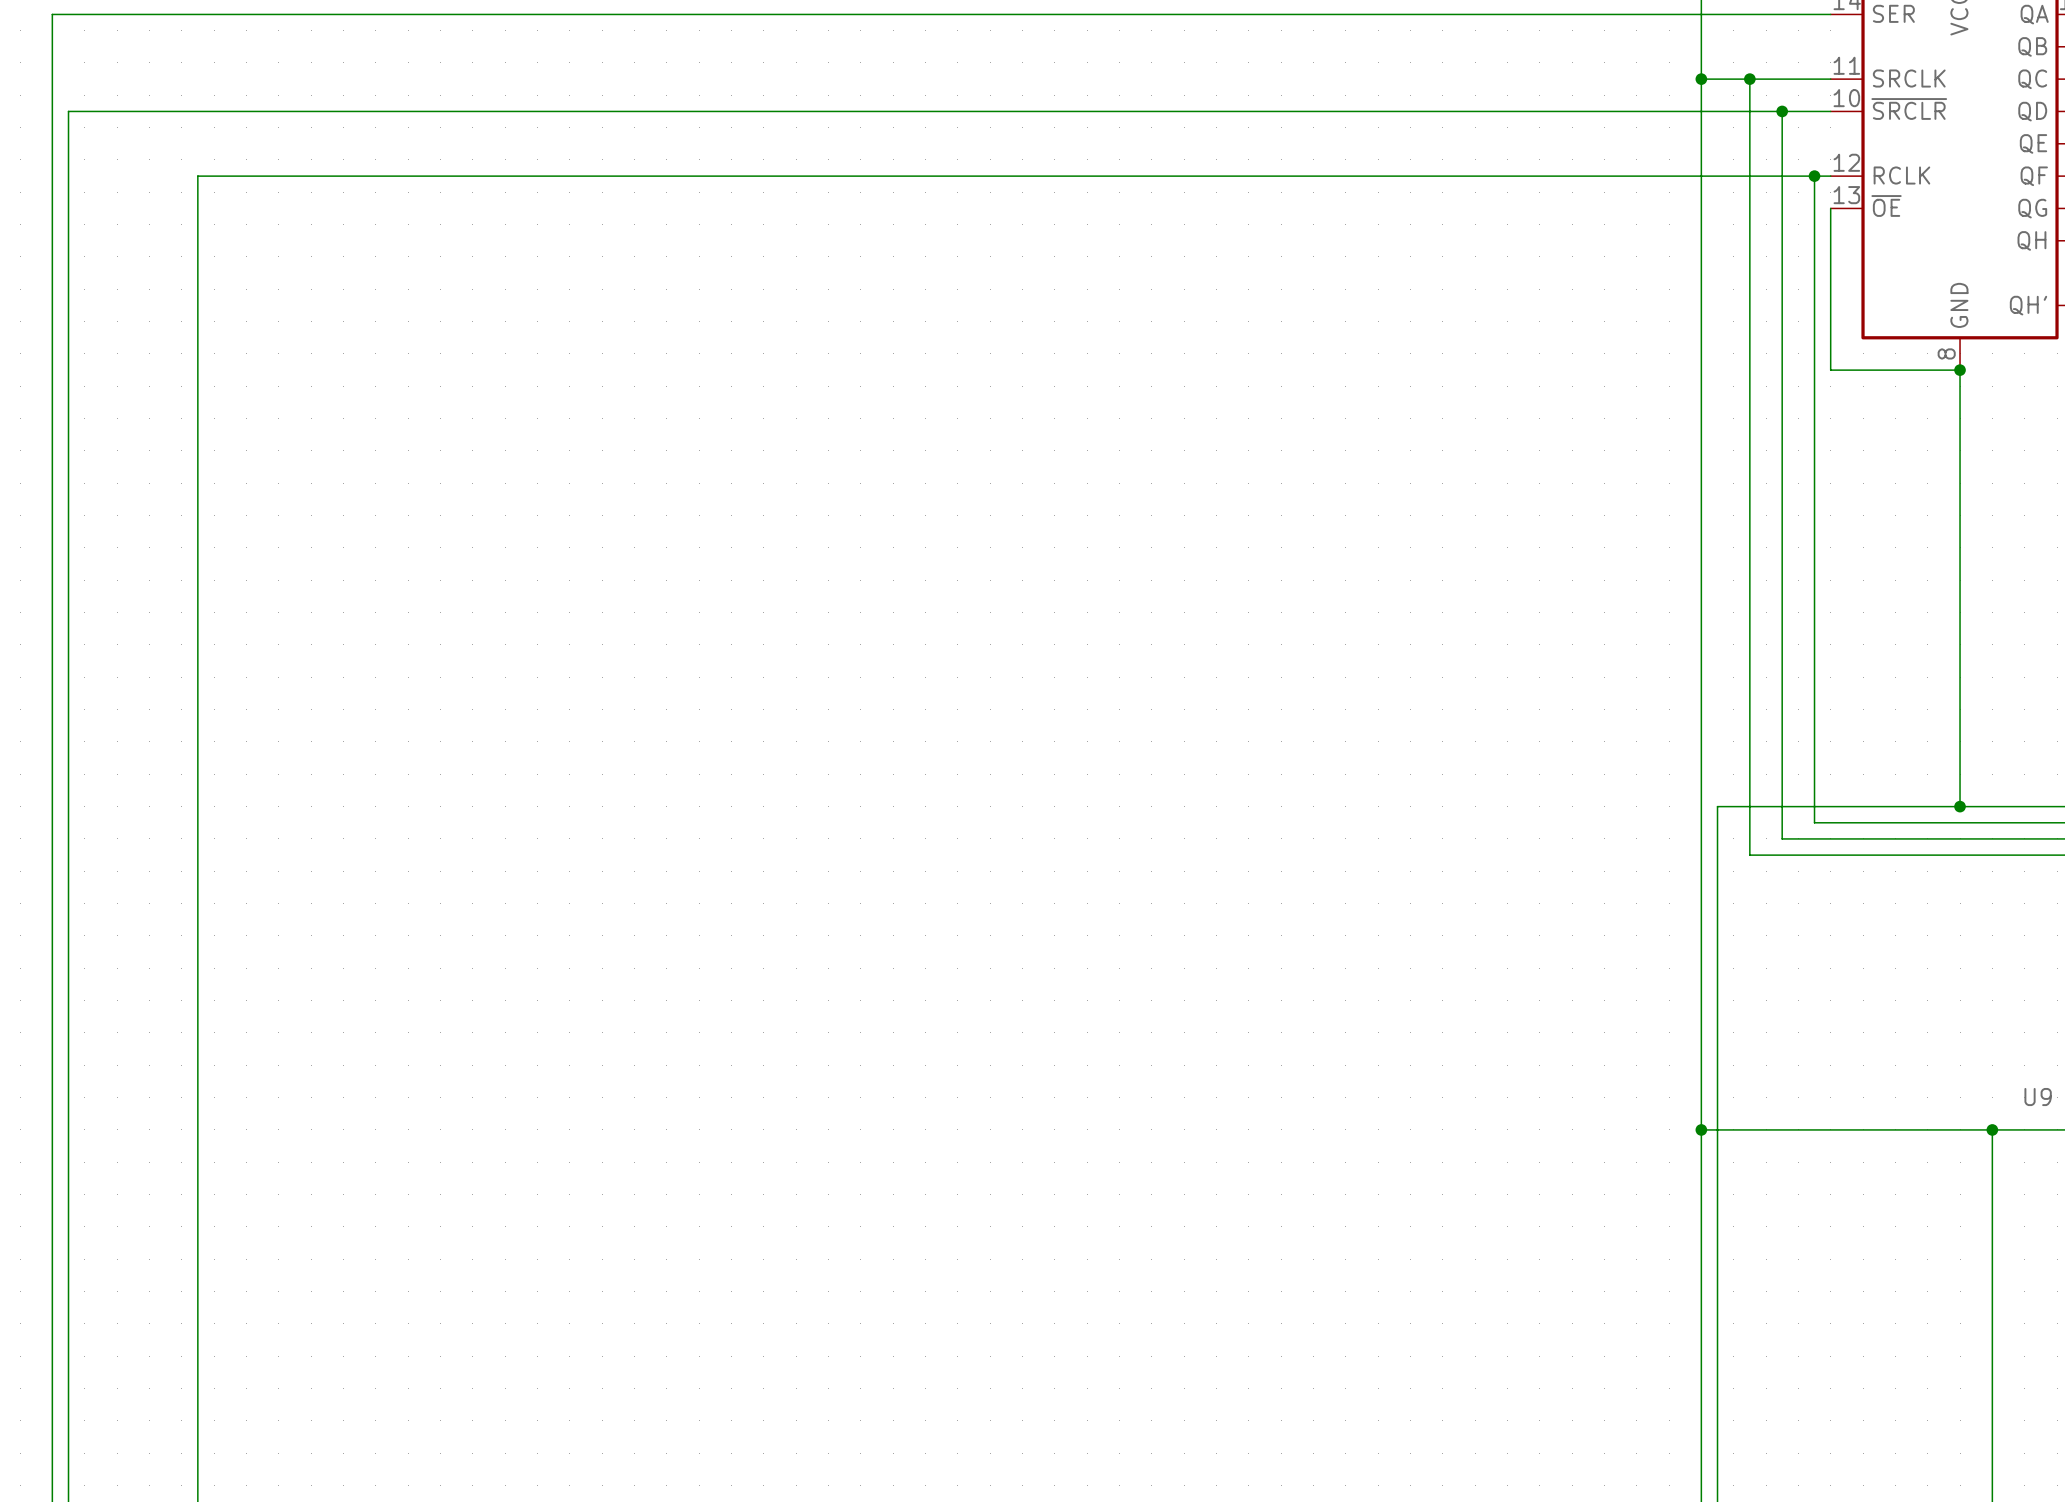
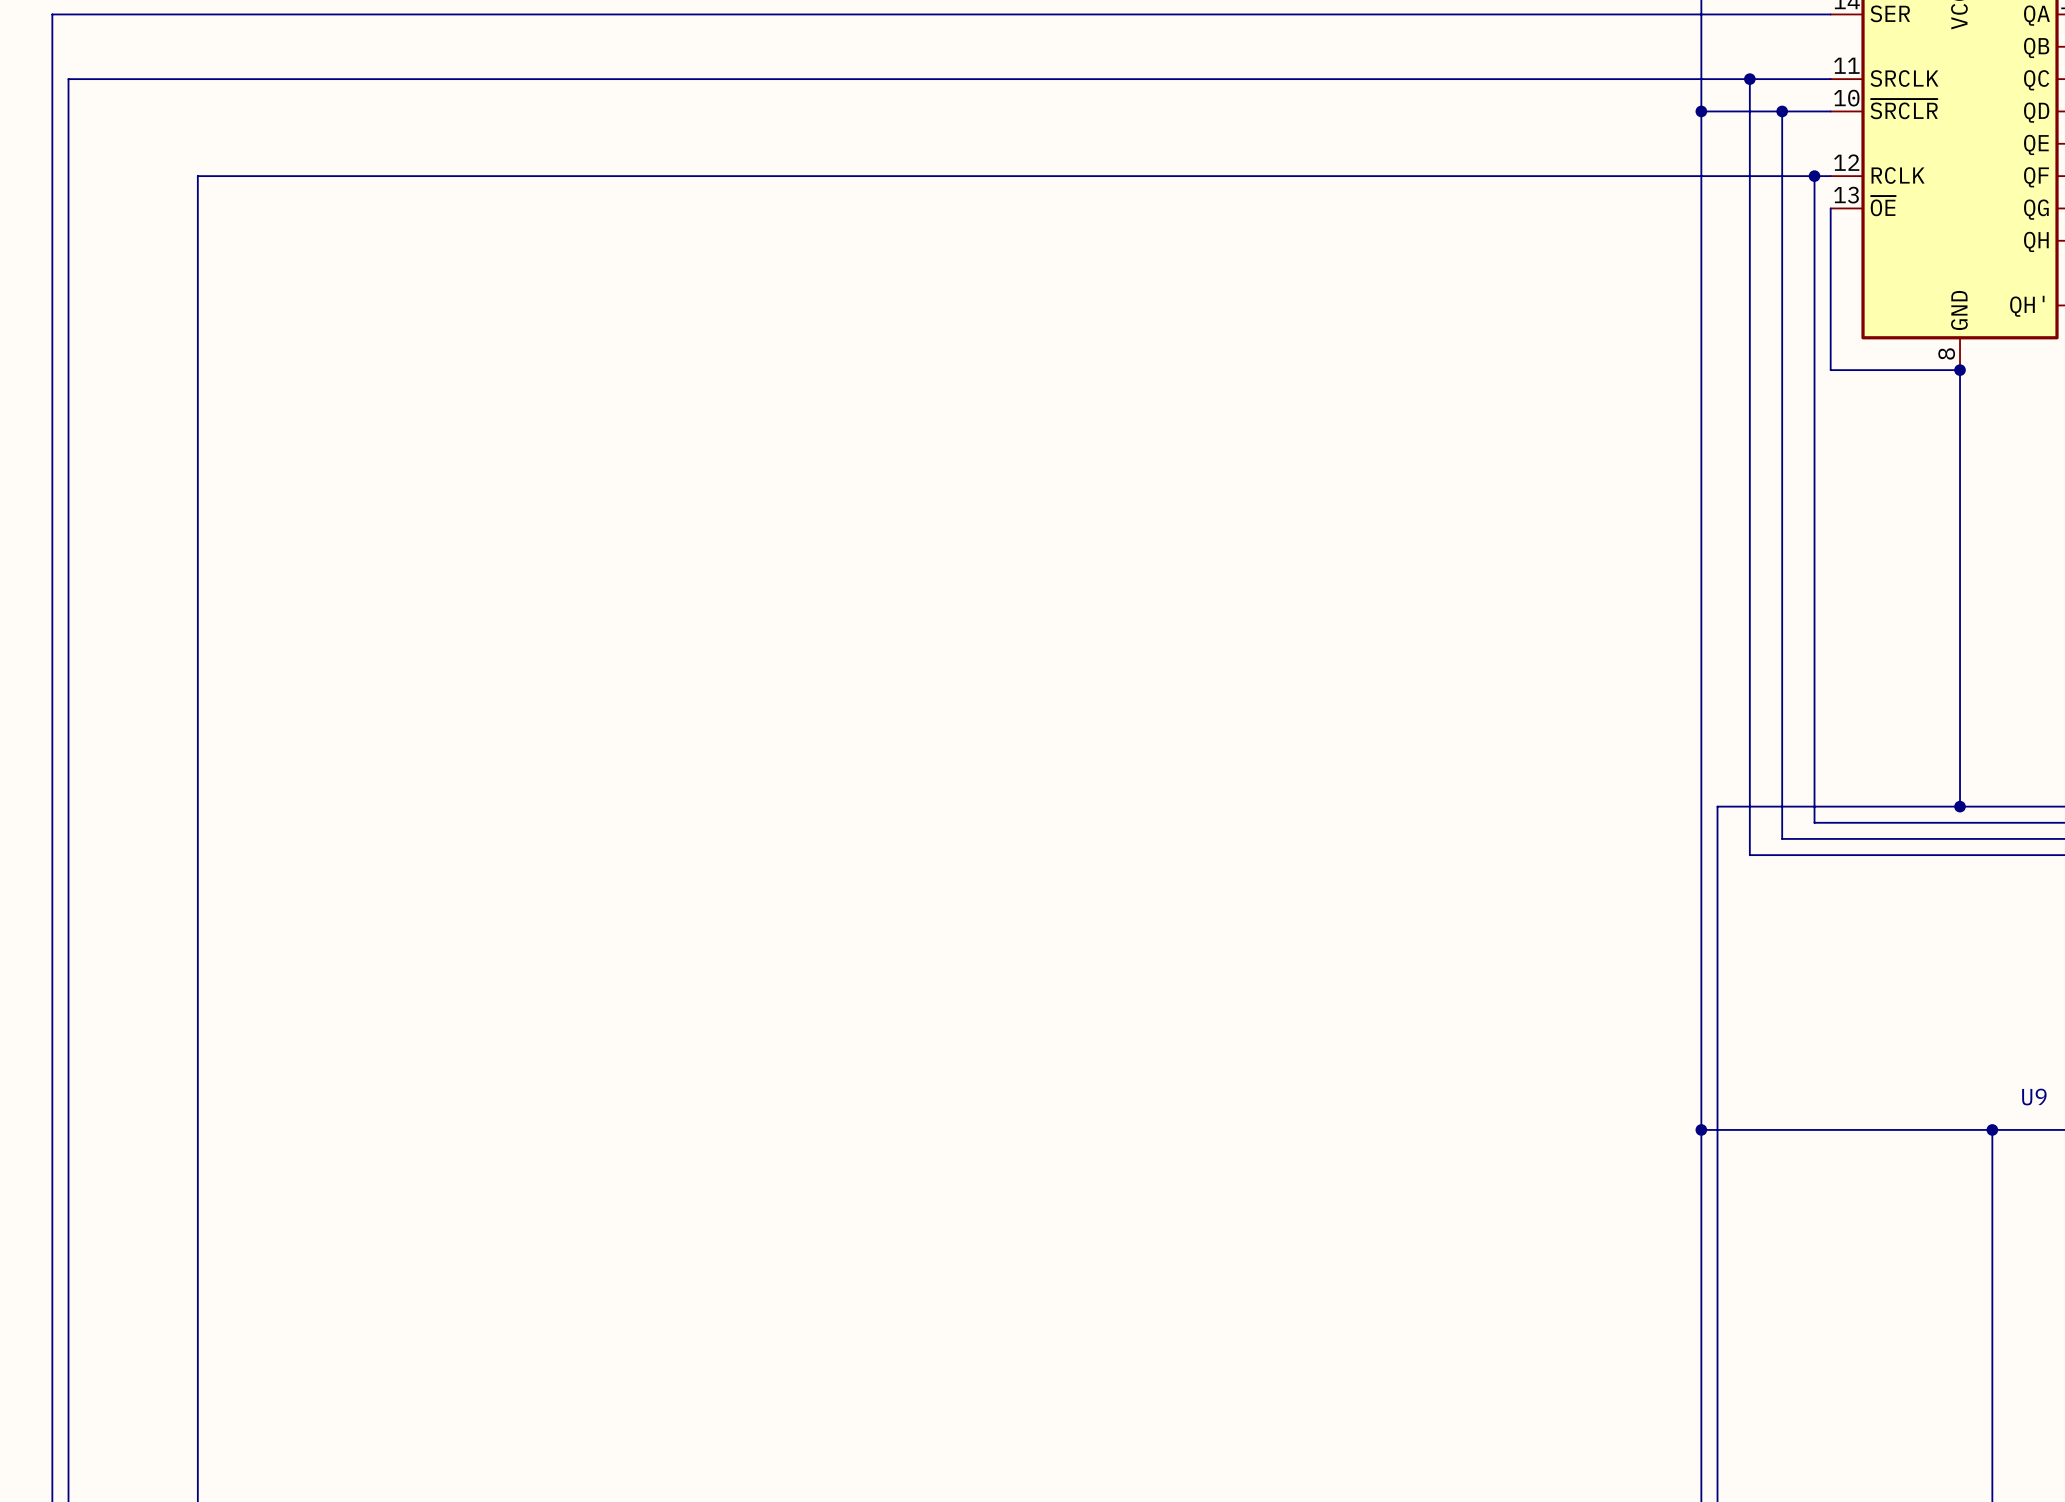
junction position: (1701, 79) -> (1701, 111)
wire: (68, 111) (1701, 111) -> (68, 111) (68, 79) (1701, 79)

